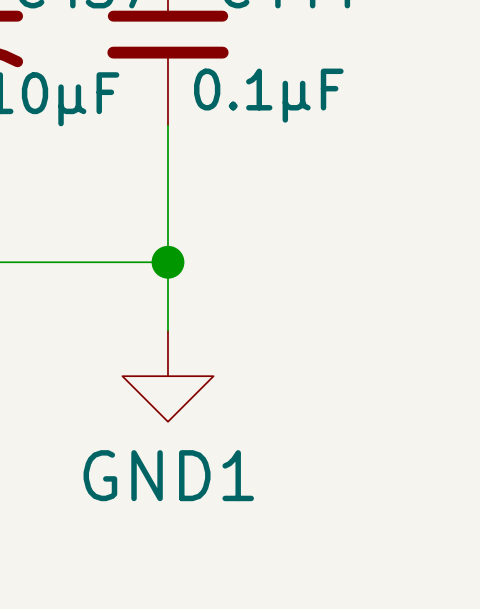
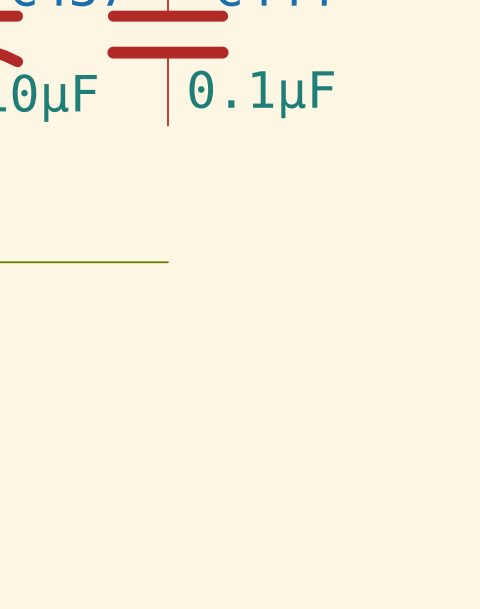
wire: (167, 125) (167, 330) -> none
junction: (167, 262) -> none
power symbol: GND1 (167, 376) -> none

